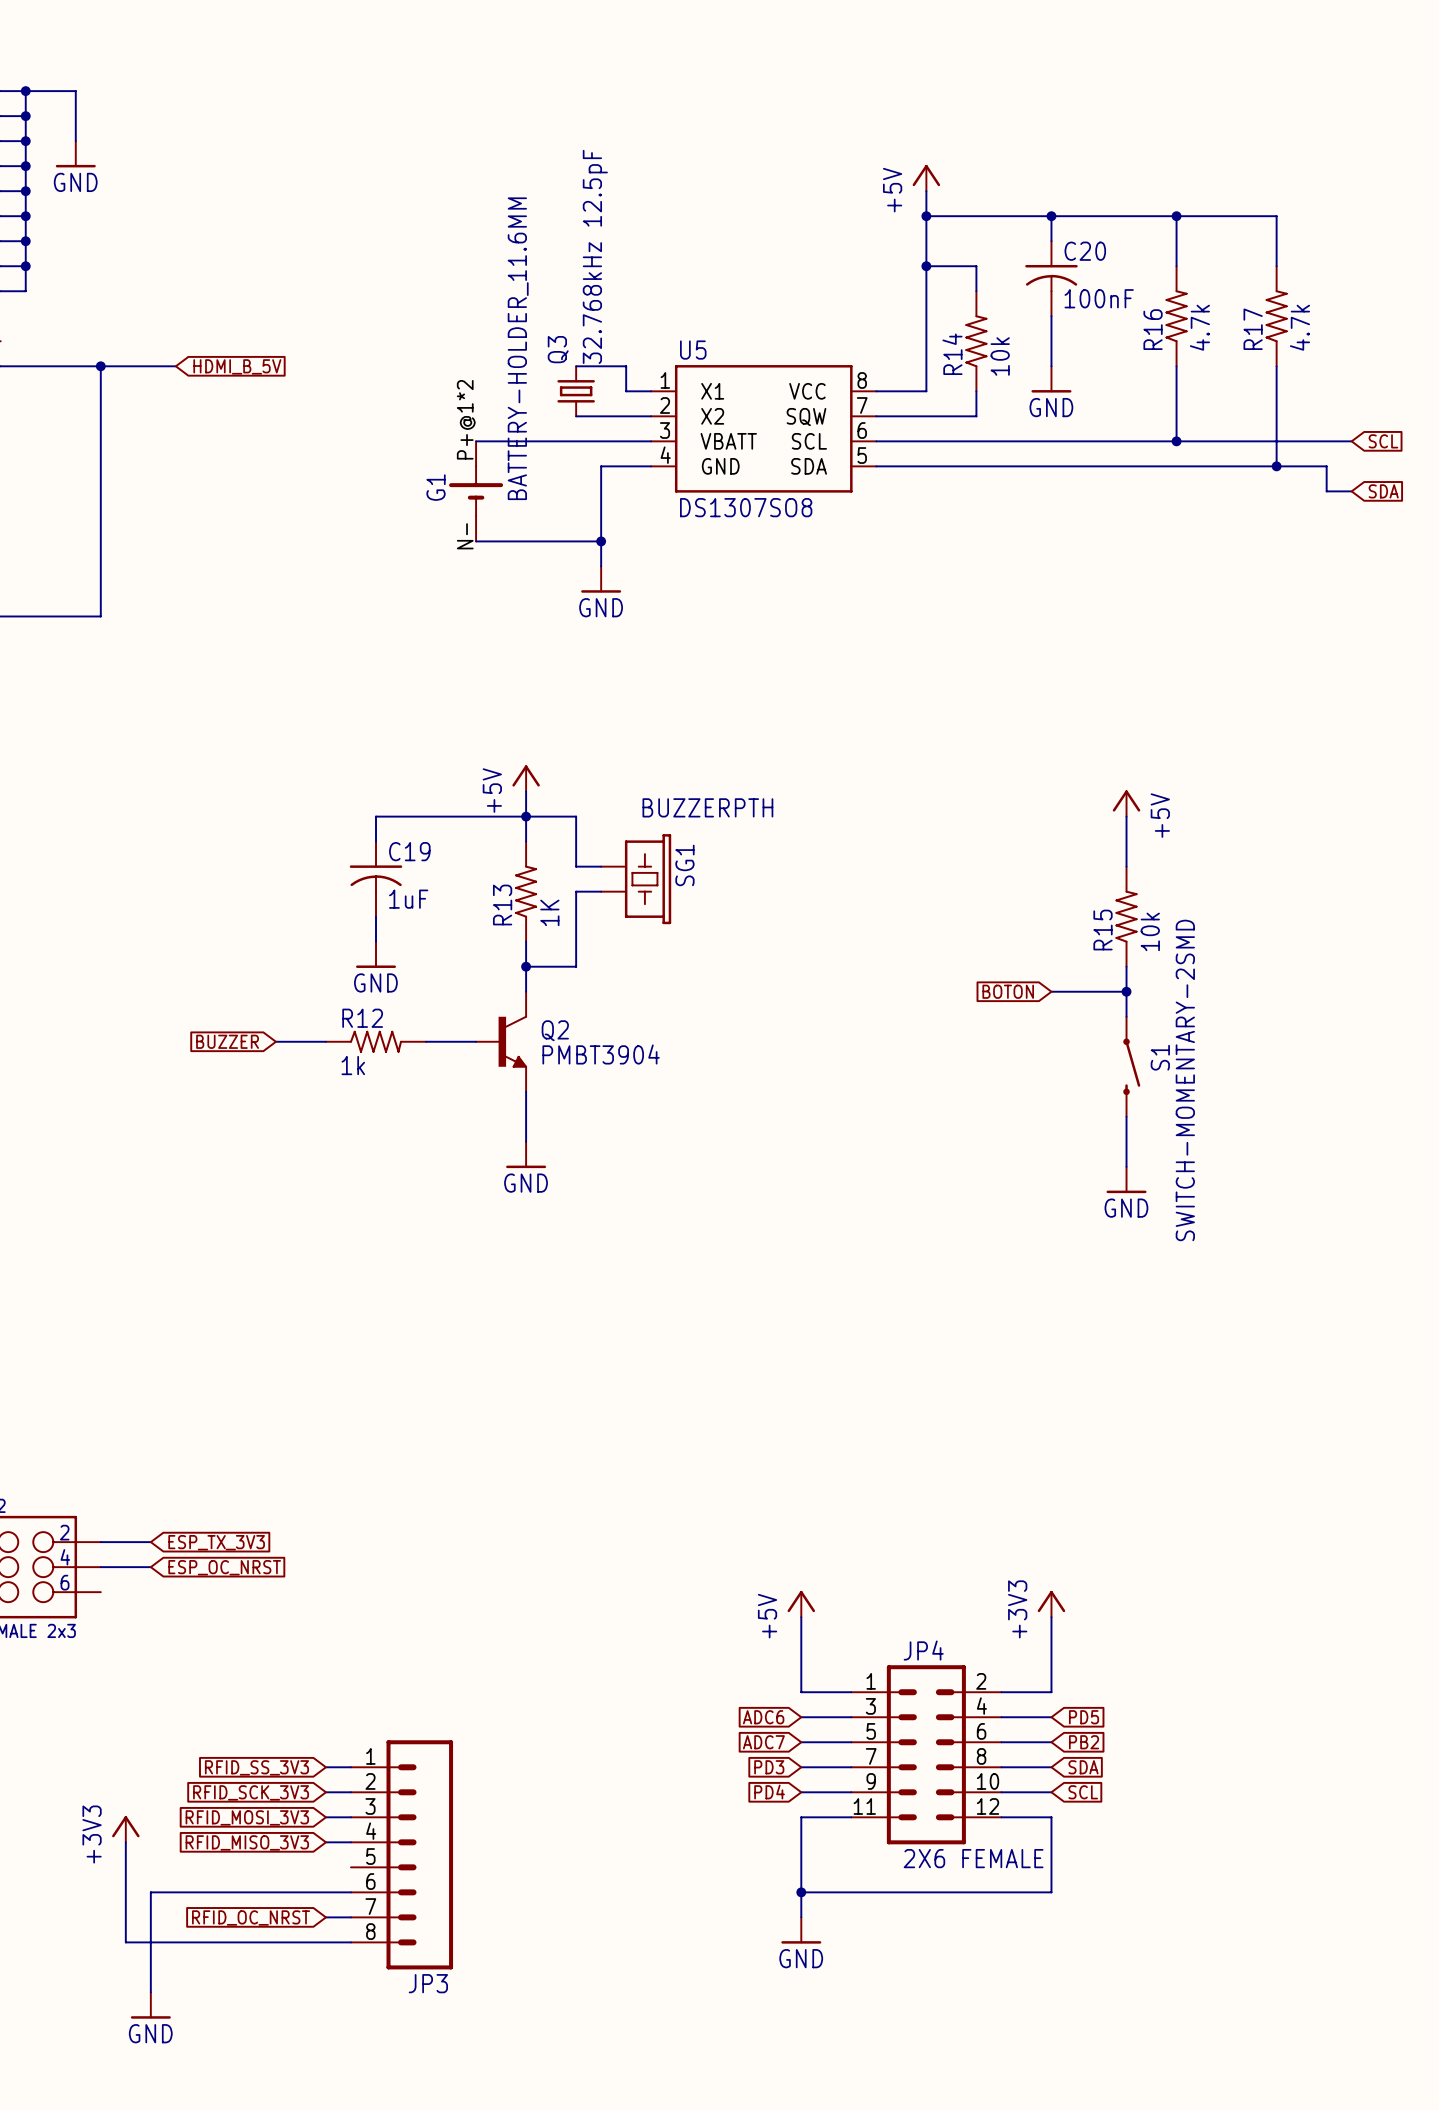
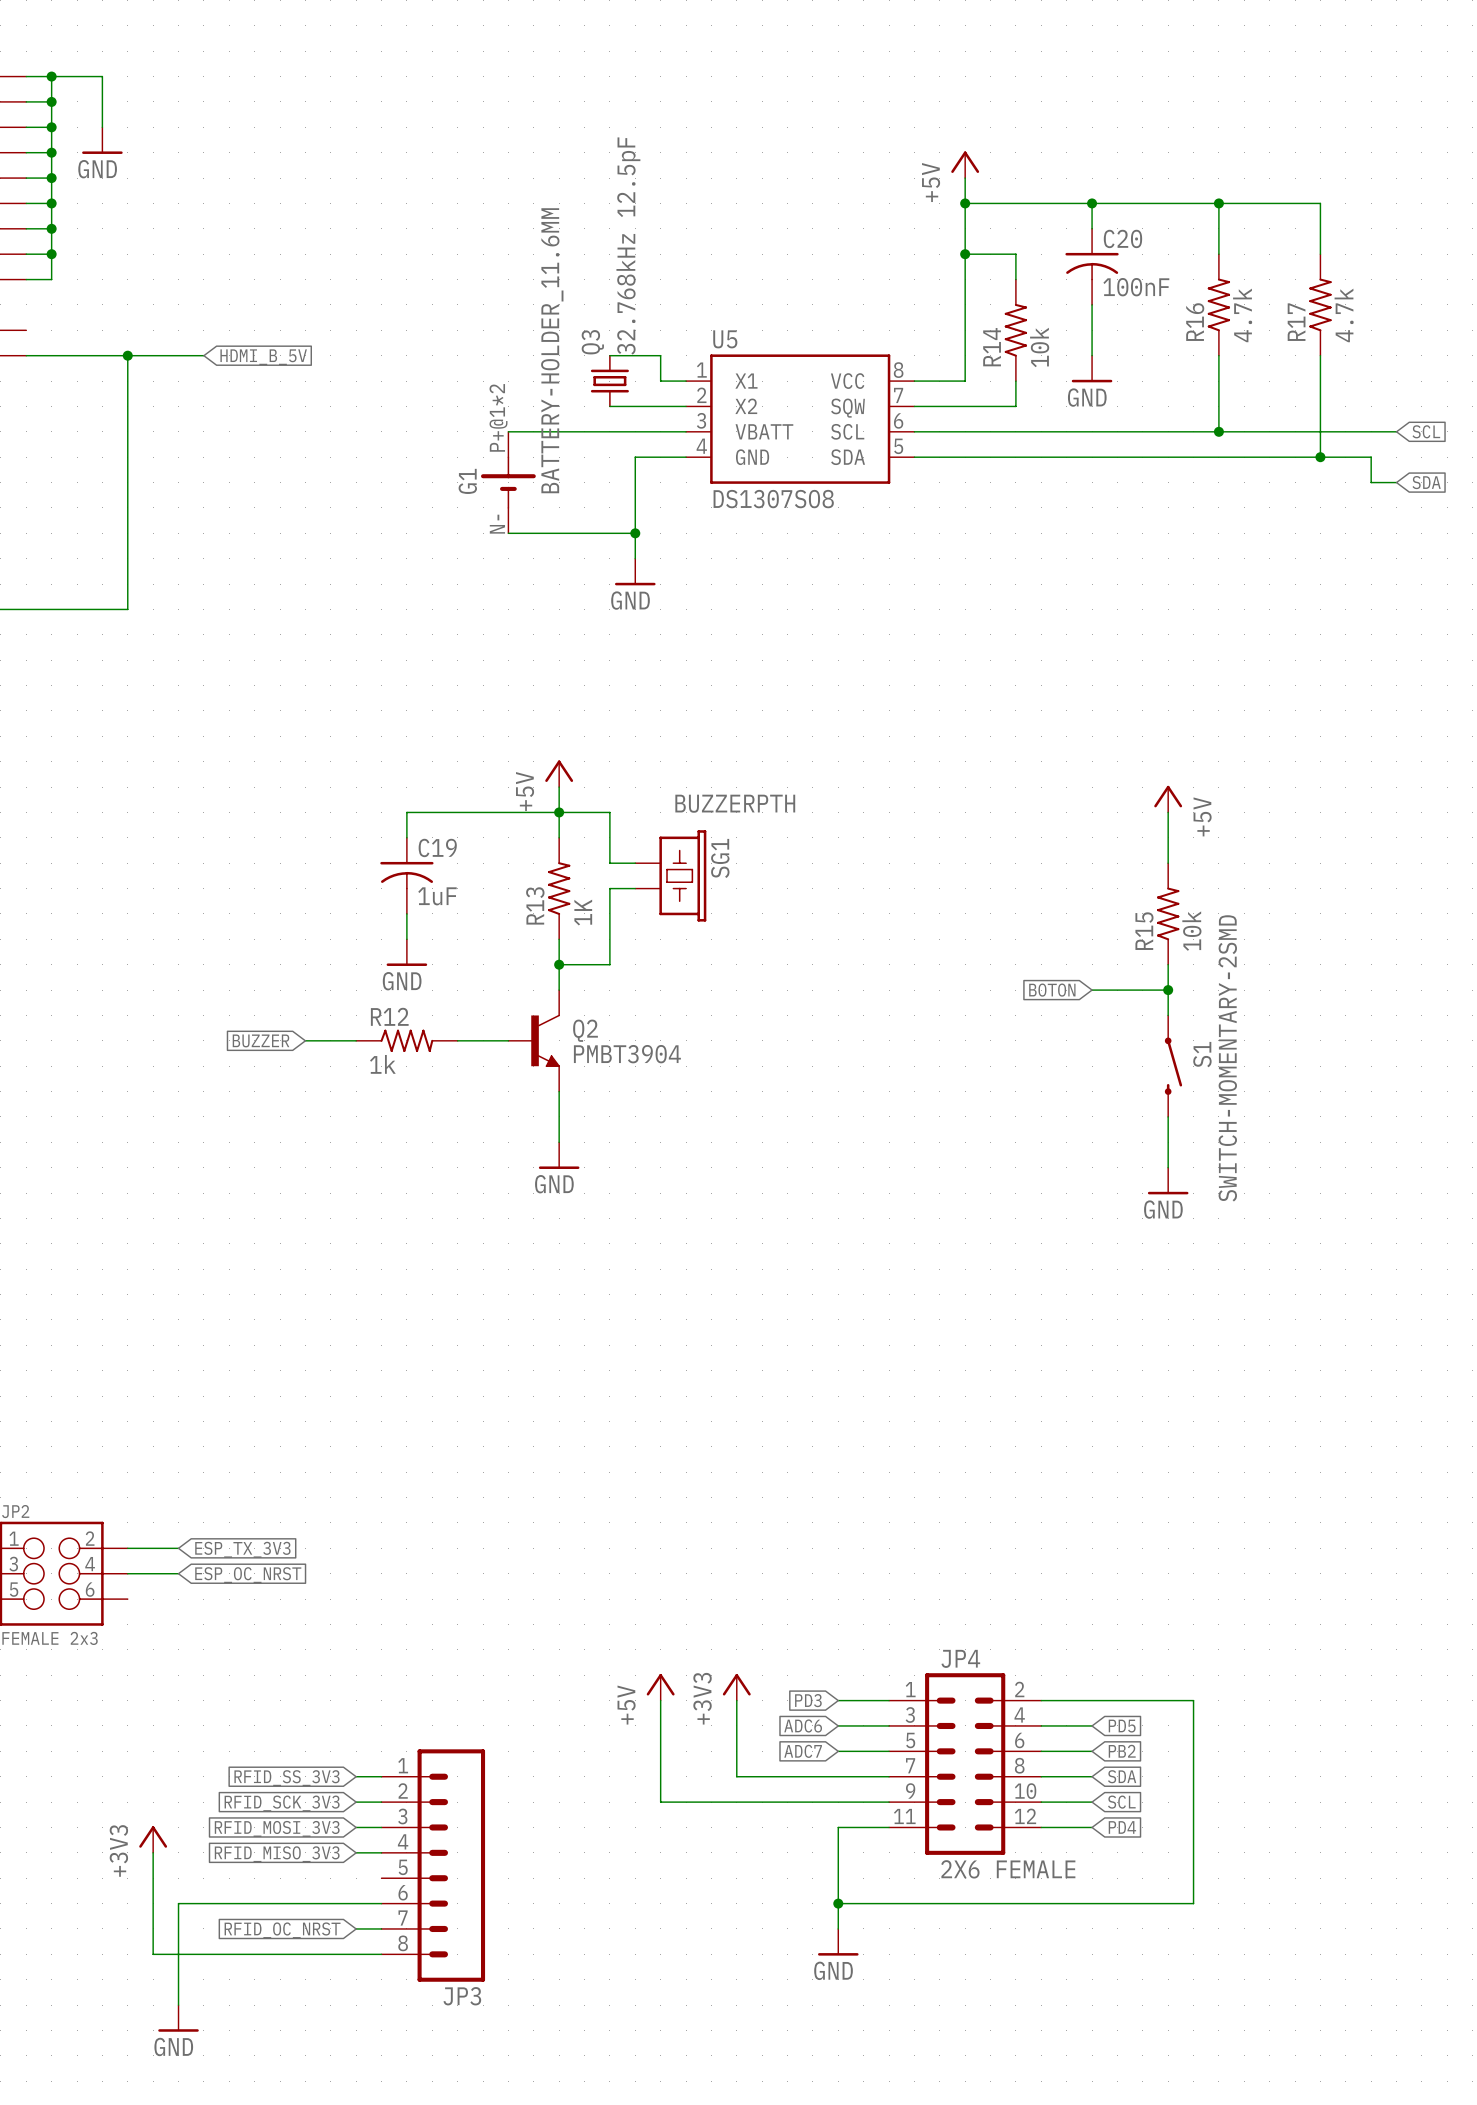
power symbol position: +5V (801, 1604) -> +5V (660, 1687)
power symbol: +3V3 (1051, 1604) -> none
wire: (801, 1617) (801, 1692) -> none
wire: (1051, 1617) (1051, 1692) -> none
power symbol: none -> +3V3 (736, 1687)
wire: none -> (660, 1700) (660, 1802) (838, 1802)
wire: none -> (736, 1700) (736, 1776) (838, 1776)
global label position: PD3 (769, 1767) -> PD3 (808, 1700)
global label: PD4 (769, 1792) -> none
wire: (1051, 1817) (1051, 1892) -> (1092, 1700) (1193, 1700) (1193, 1903) (1092, 1903)
global label: none -> PD4 (1122, 1827)

